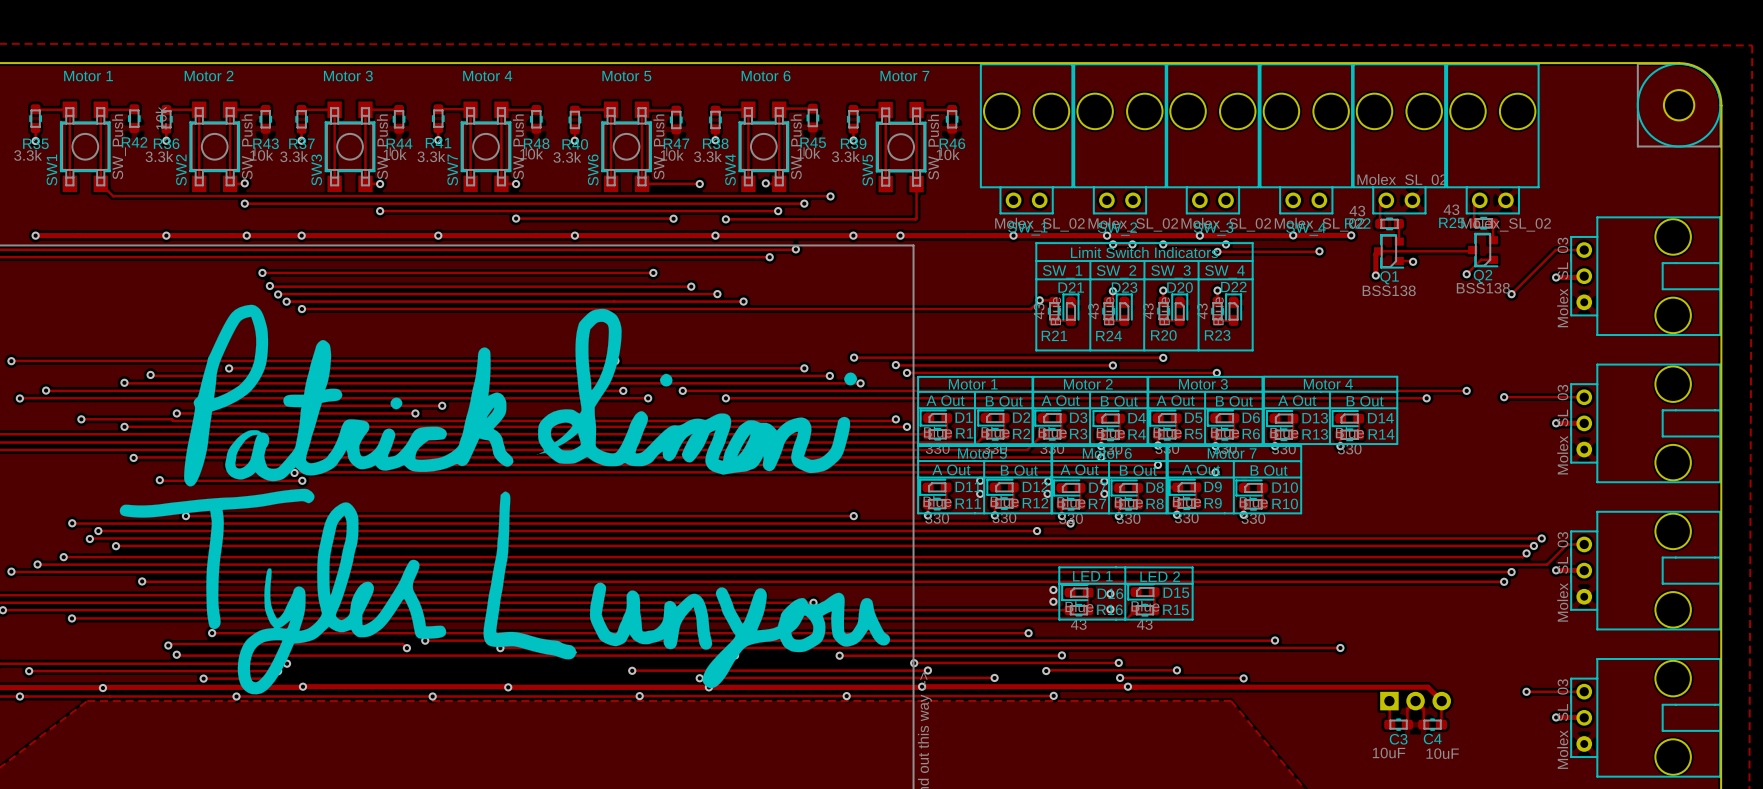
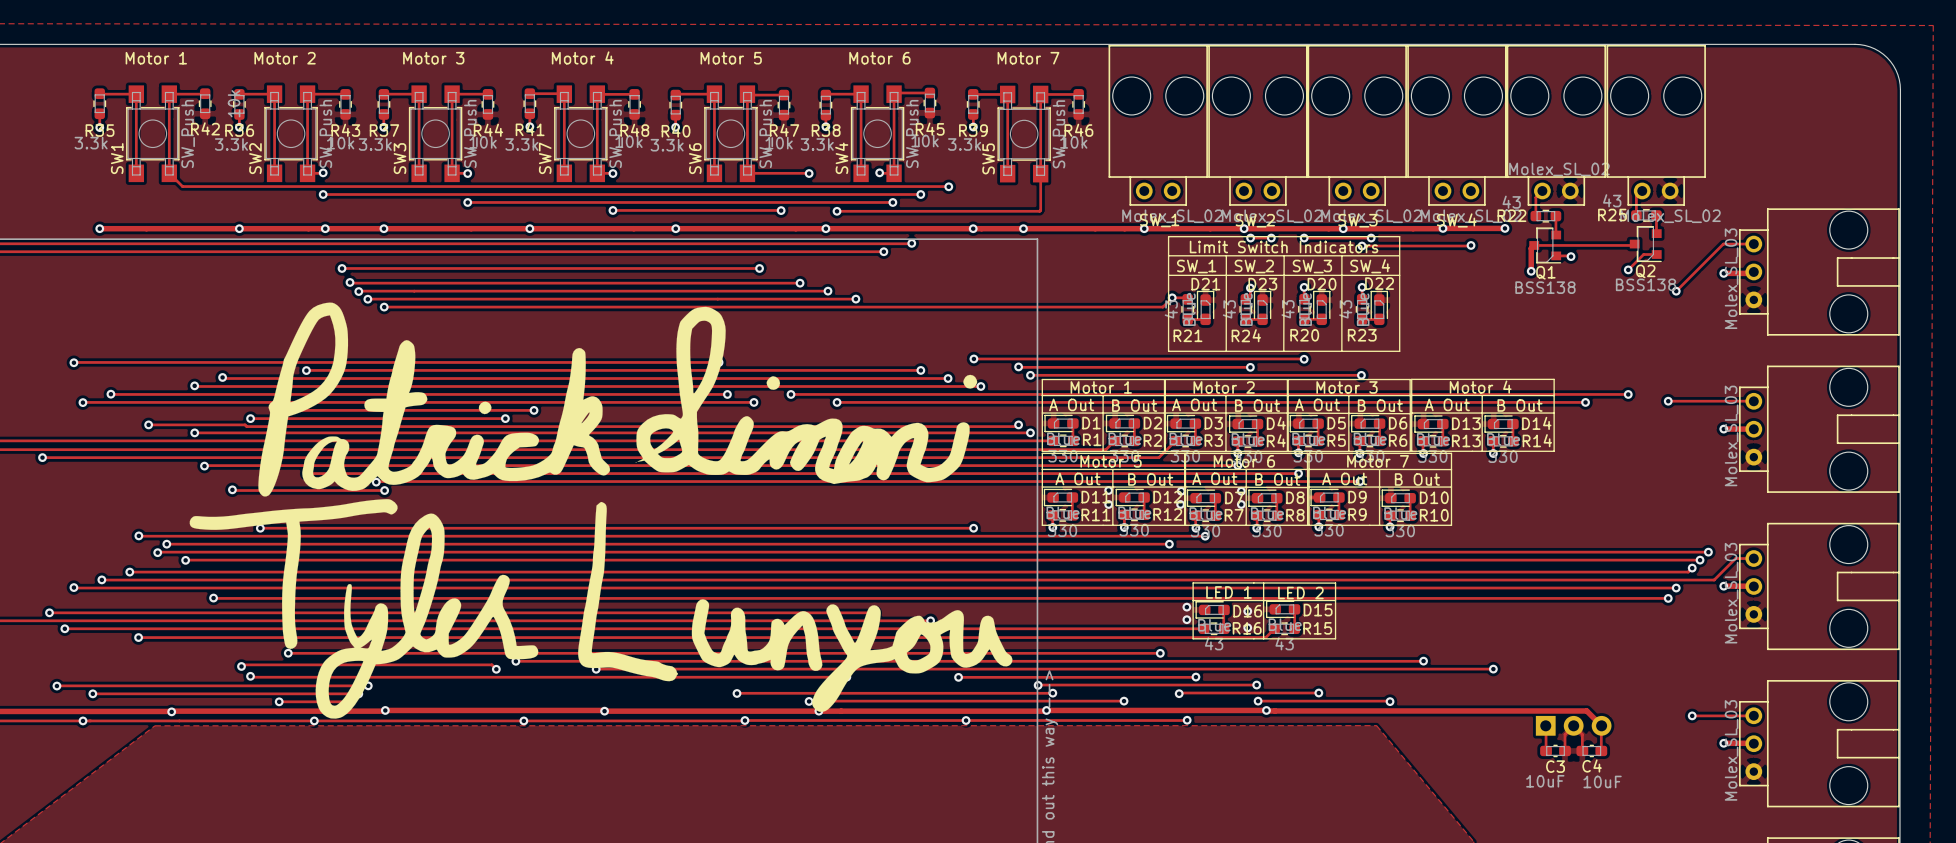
part: (1679, 105) -> none

